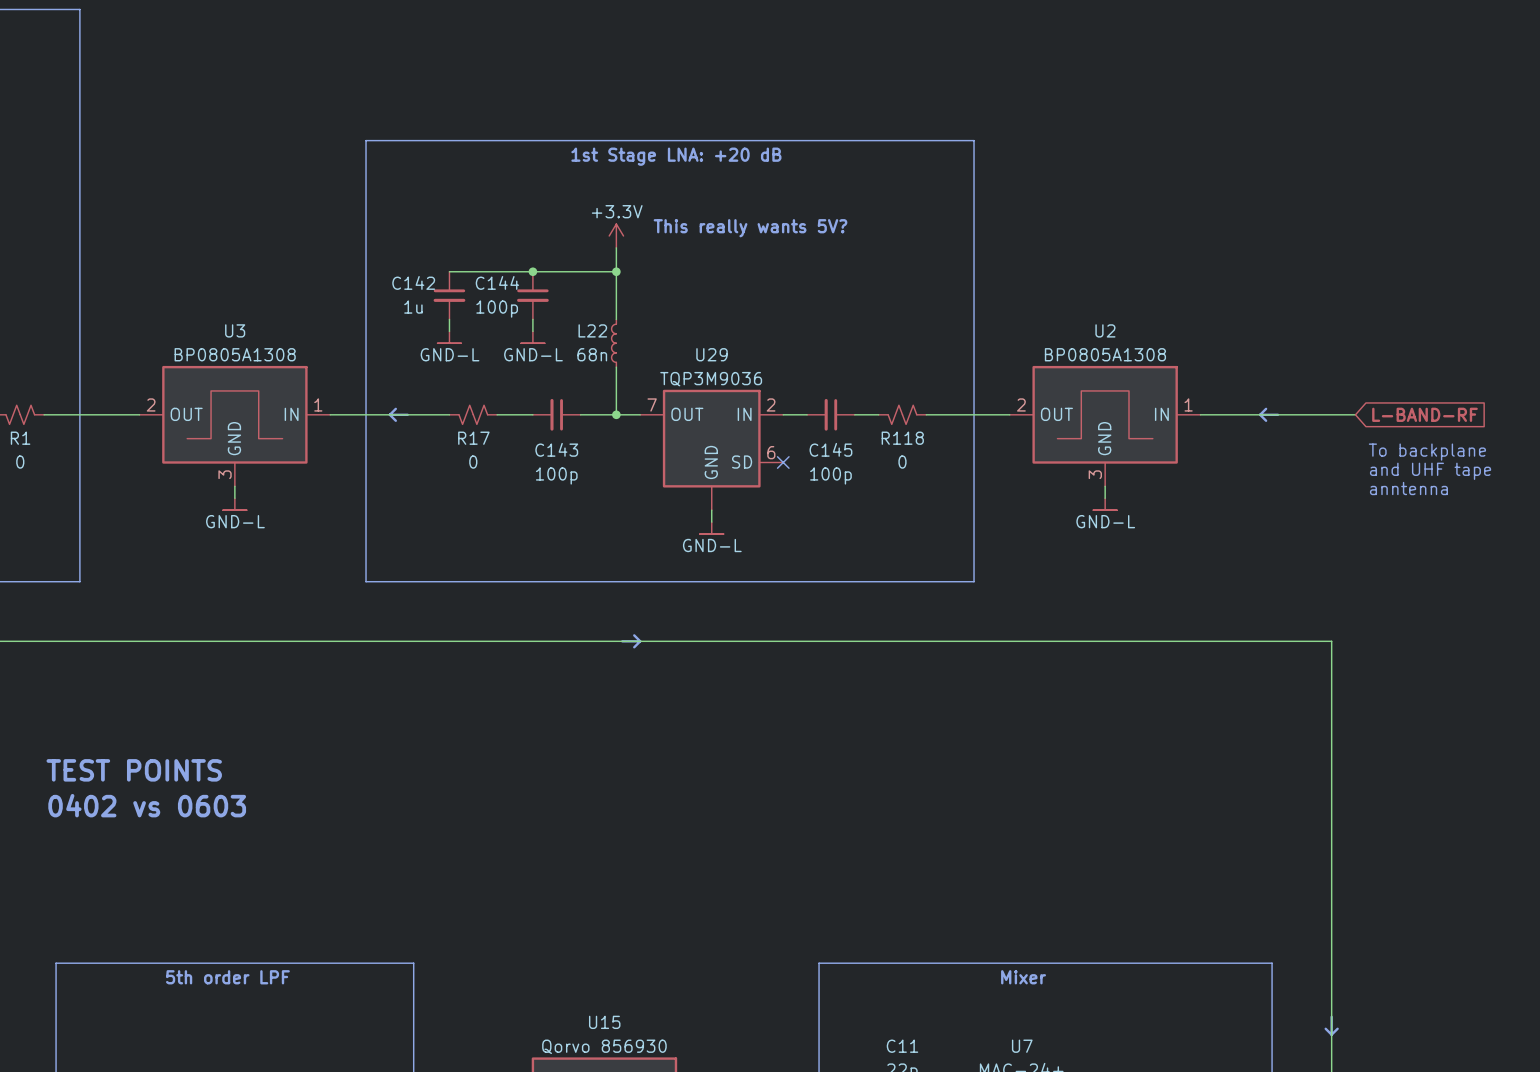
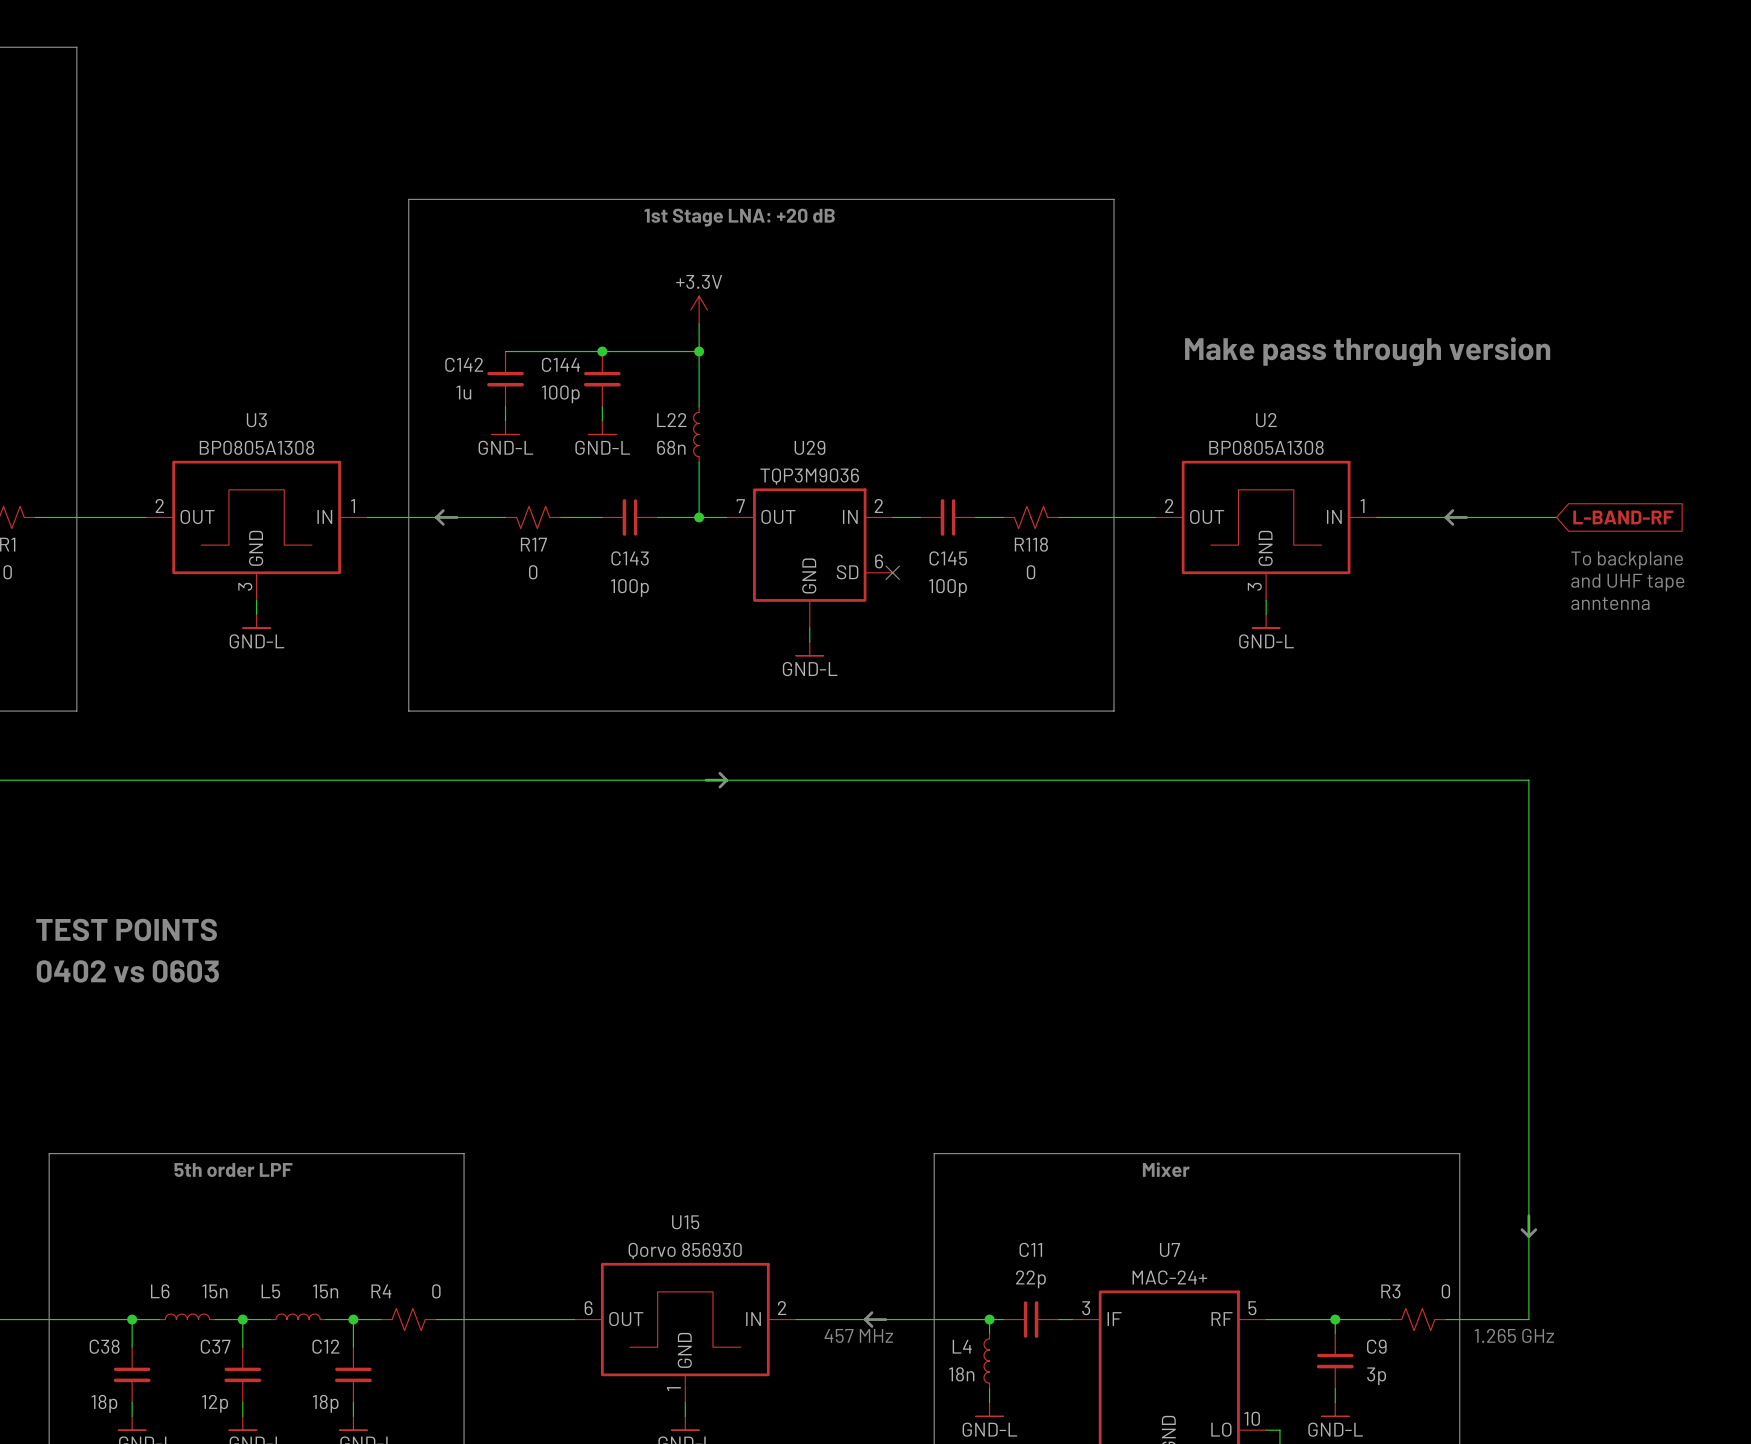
text: This really wants 5V? (750, 228) -> none
text: none -> Make pass through version (1367, 351)

